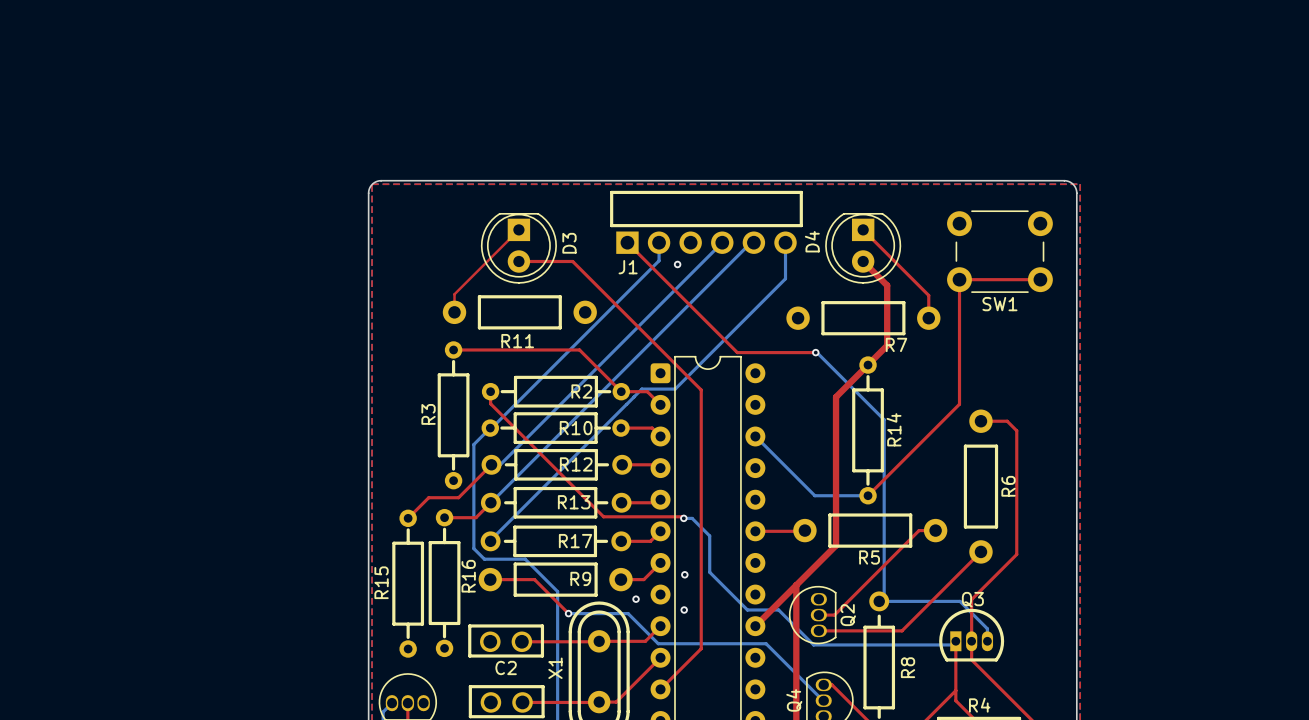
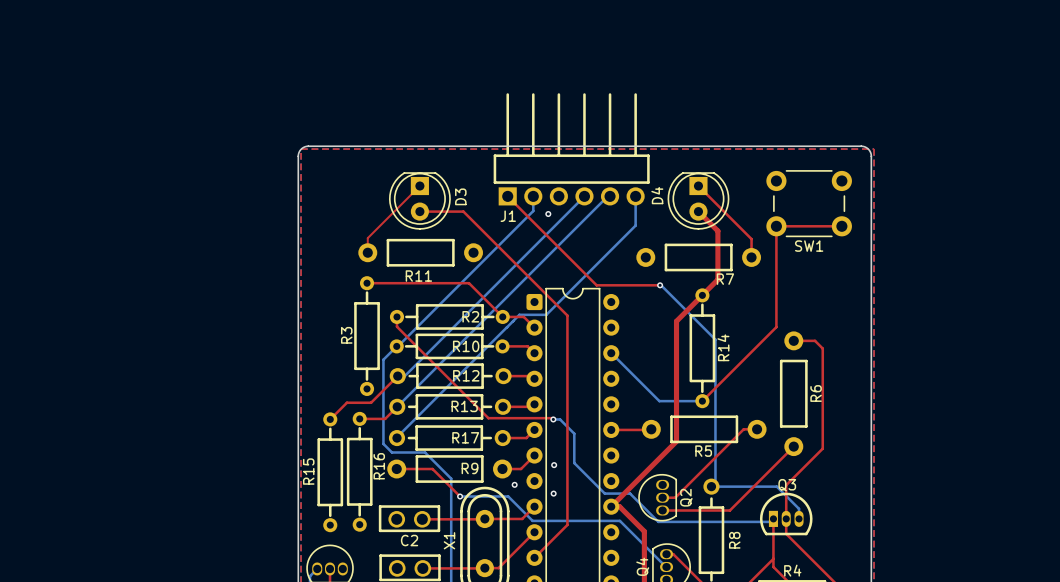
J1 footprint: [610, 190, 803, 254] -> [493, 93, 650, 206]
top track: (796, 585) (796, 656) -> (611, 506) (619, 506) (644, 531)

